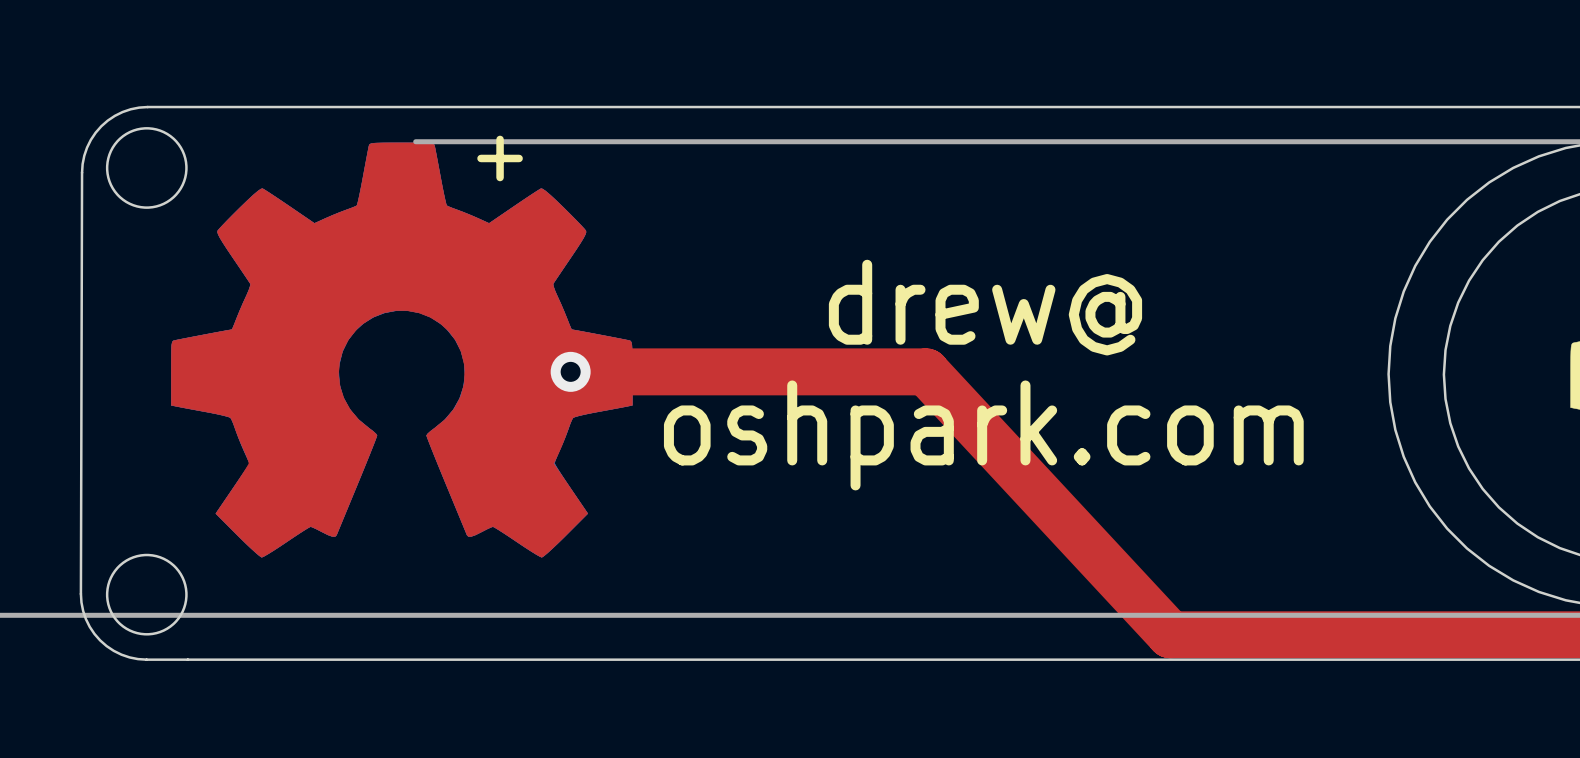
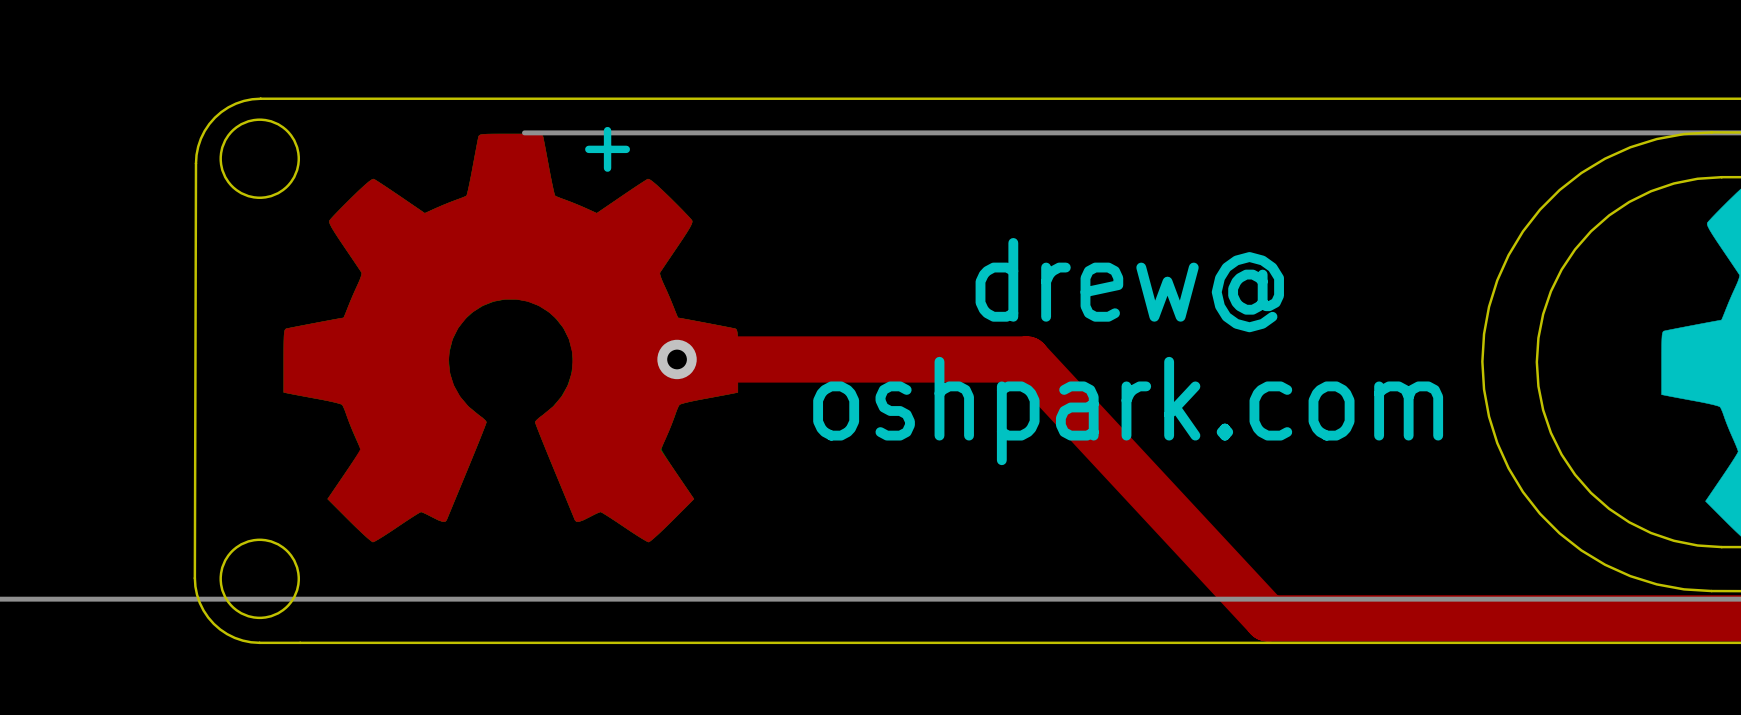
text position: drew@ (985, 307) -> drew@ (1129, 285)
text position: oshpark.com (983, 435) -> oshpark.com (1128, 411)

